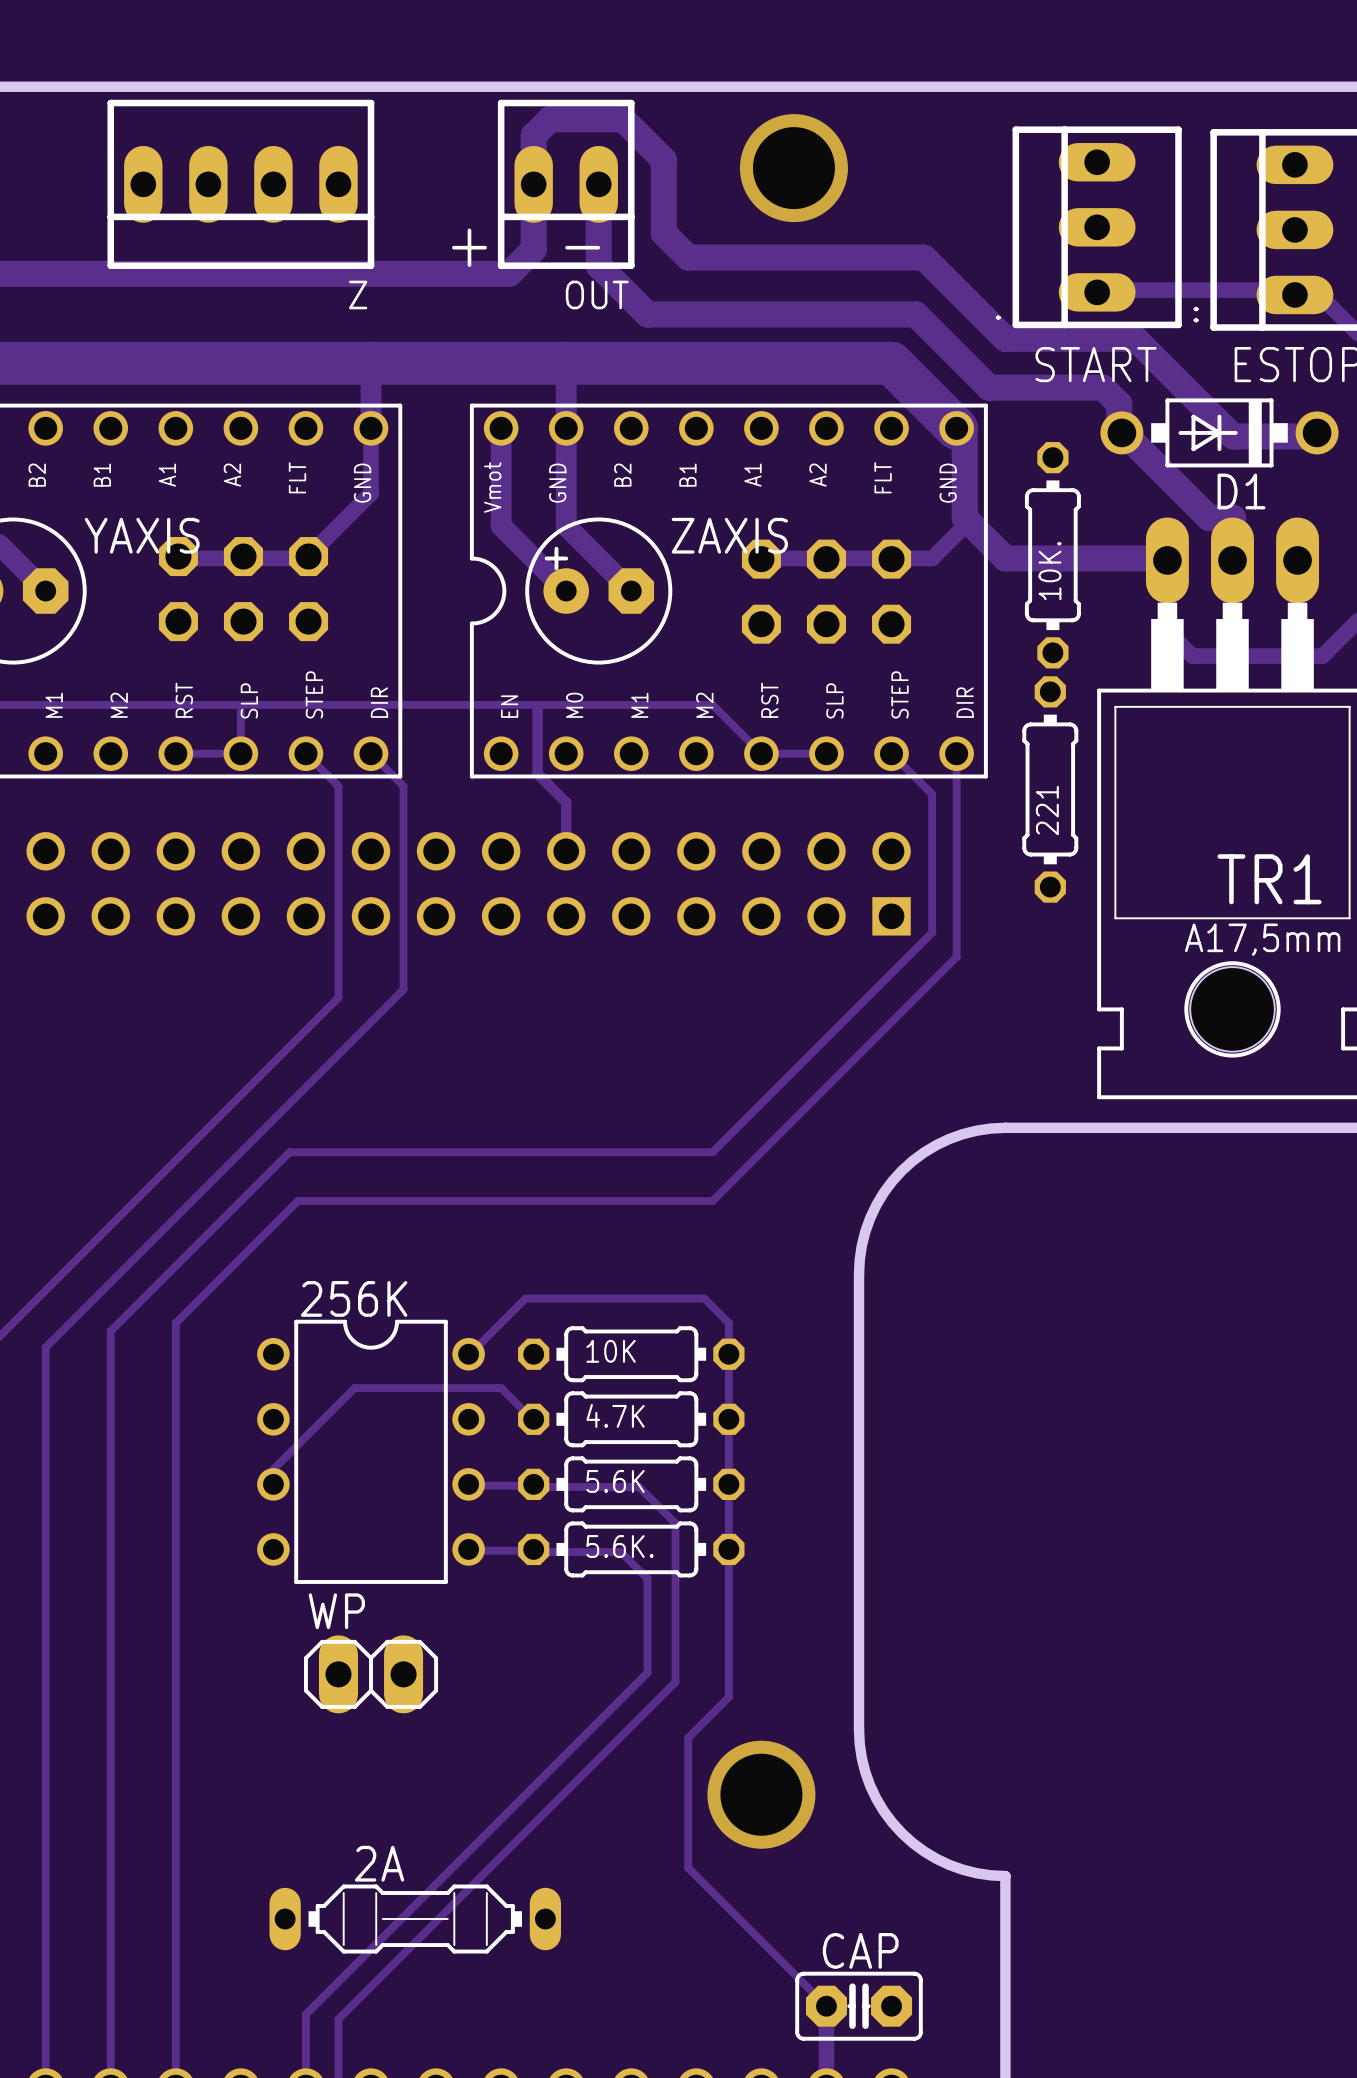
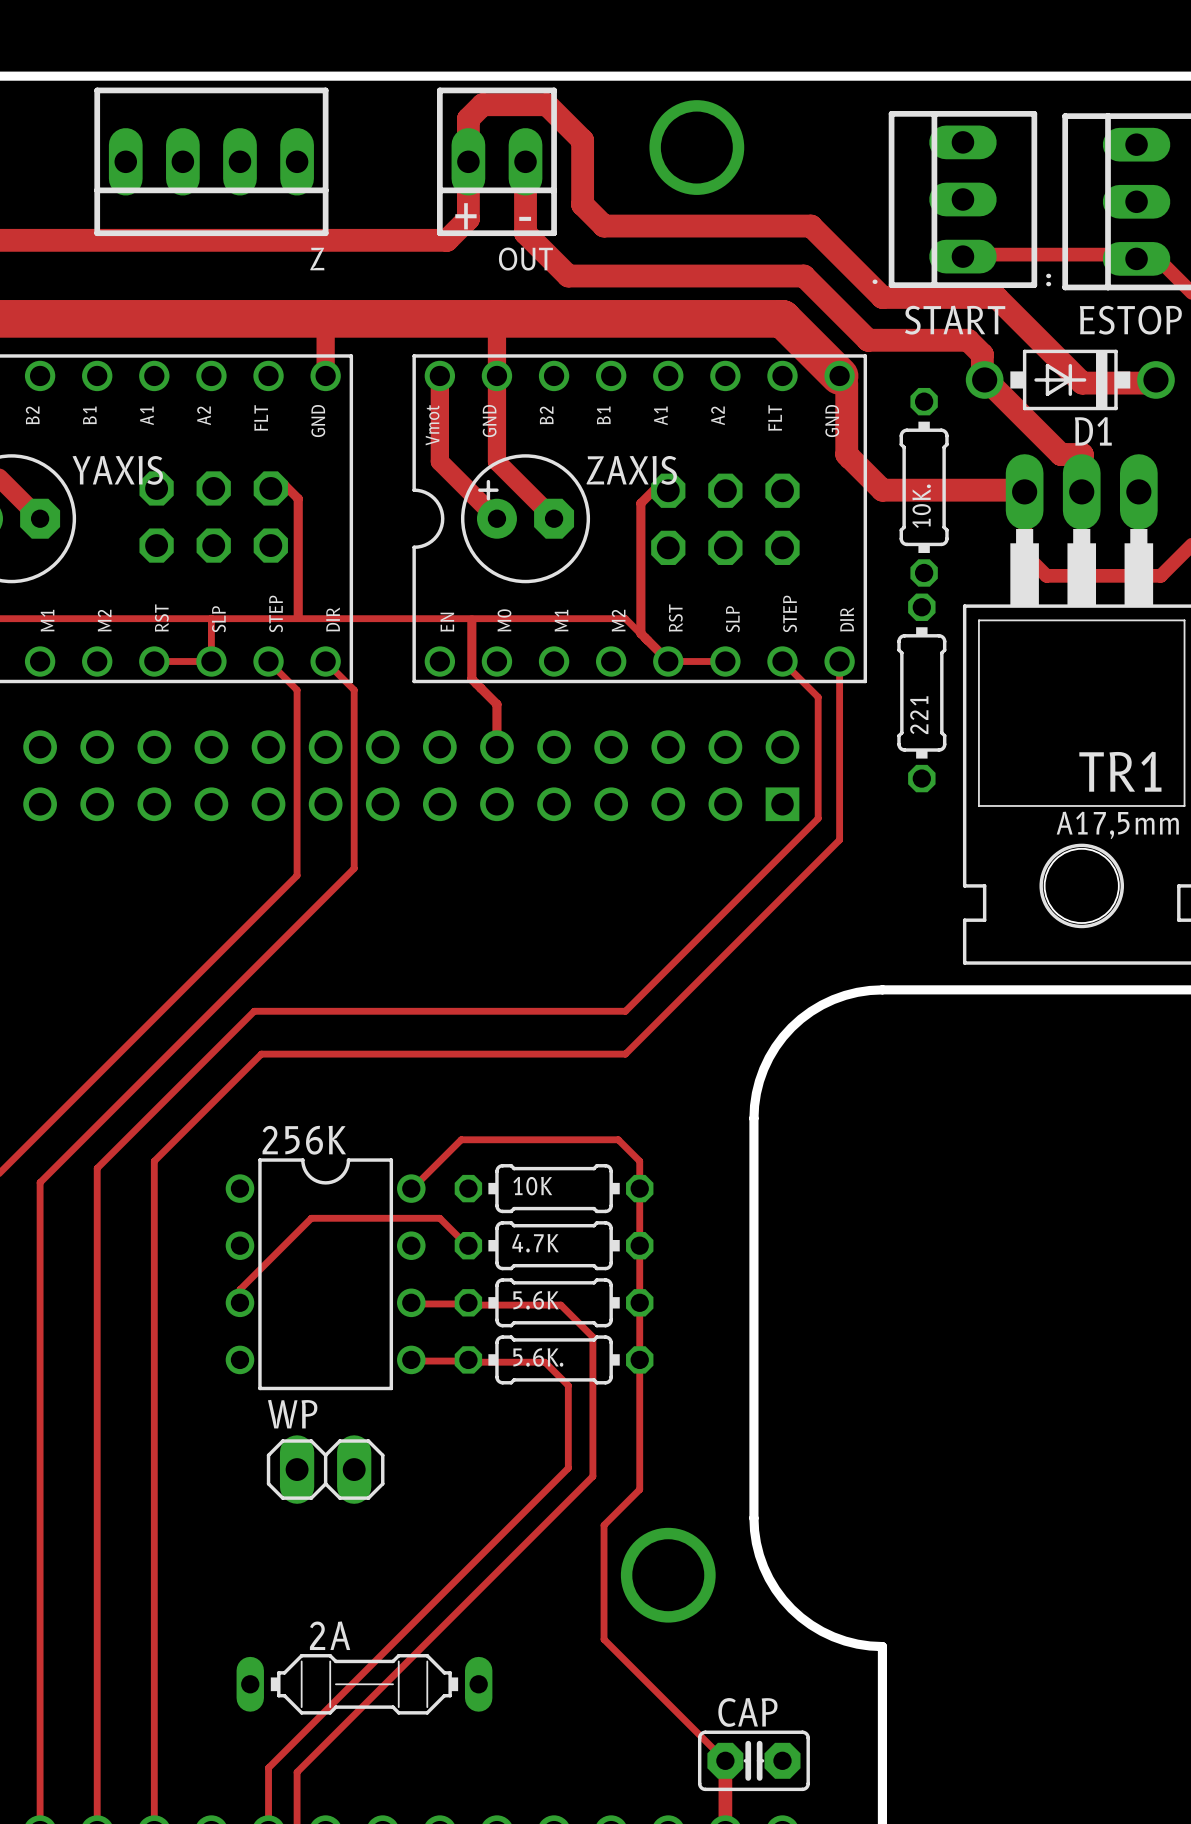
track: (371, 428) (371, 493) (305, 558) (183, 558) (175, 550) -> none
track: (964, 525) (932, 558) (761, 558) -> none
track: none -> (273, 485) (284, 485) (298, 498) (298, 617)
track: none -> (666, 487) (656, 487) (640, 503) (640, 633) (668, 660)

